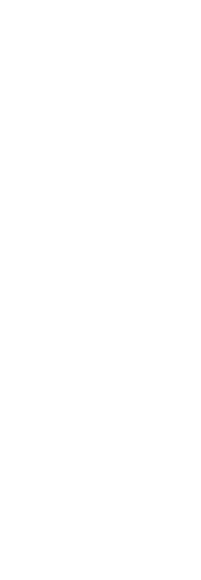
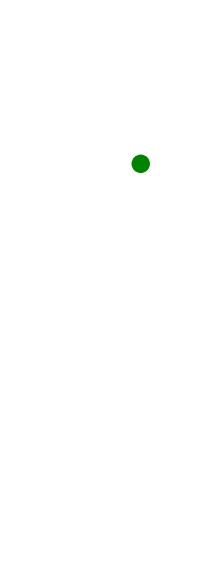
junction: none -> (140, 163)

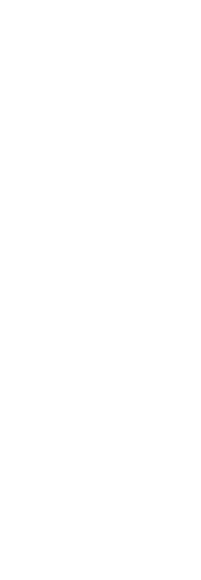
junction: (140, 163) -> none

